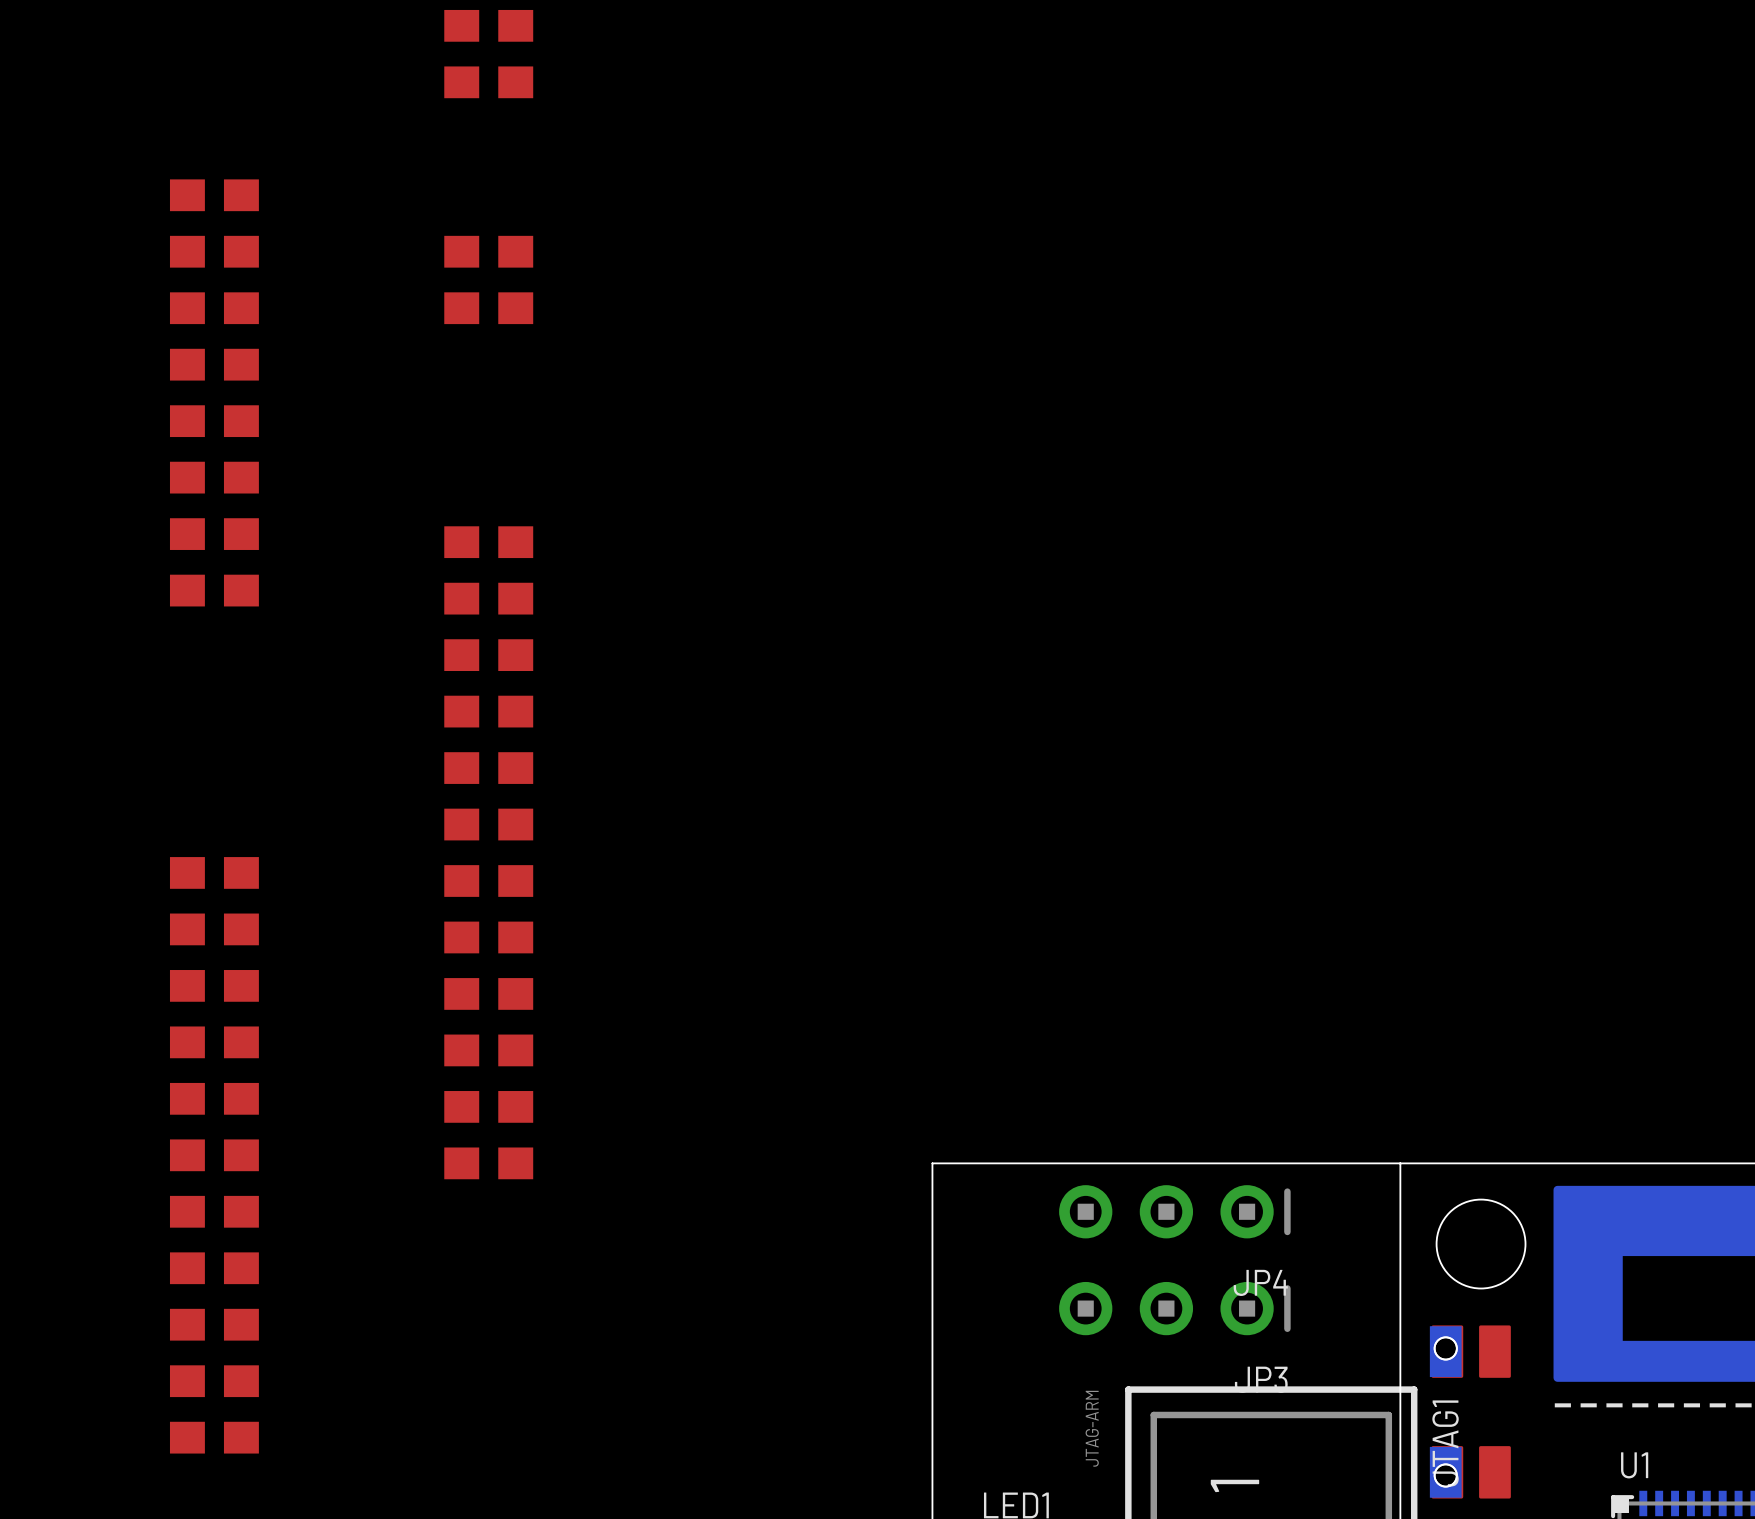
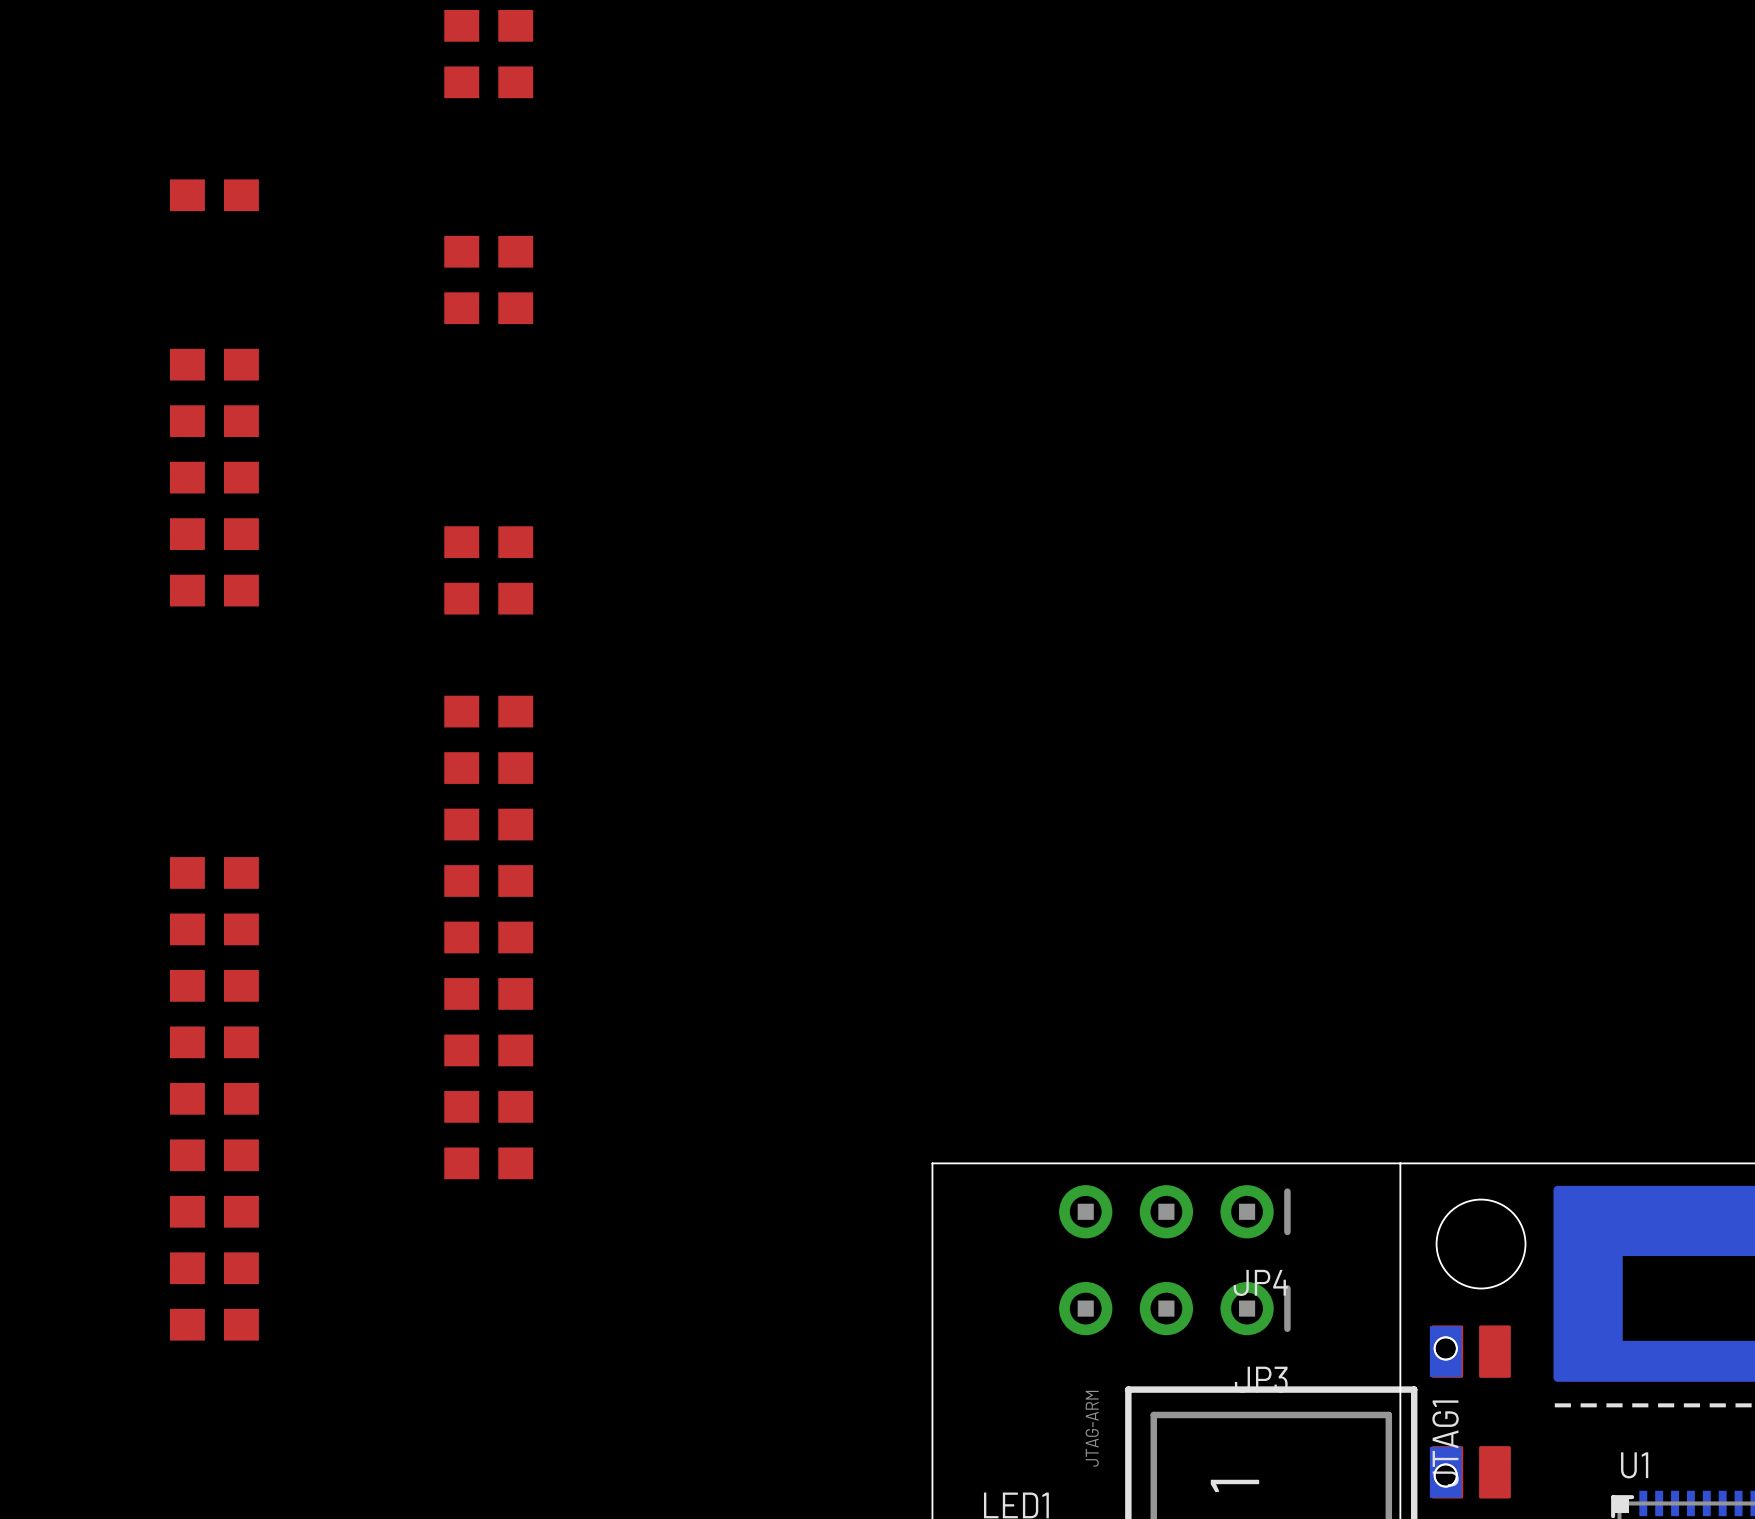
part: (214, 251) -> none
part: (214, 308) -> none
part: (488, 655) -> none
part: (214, 1381) -> none
part: (214, 1437) -> none

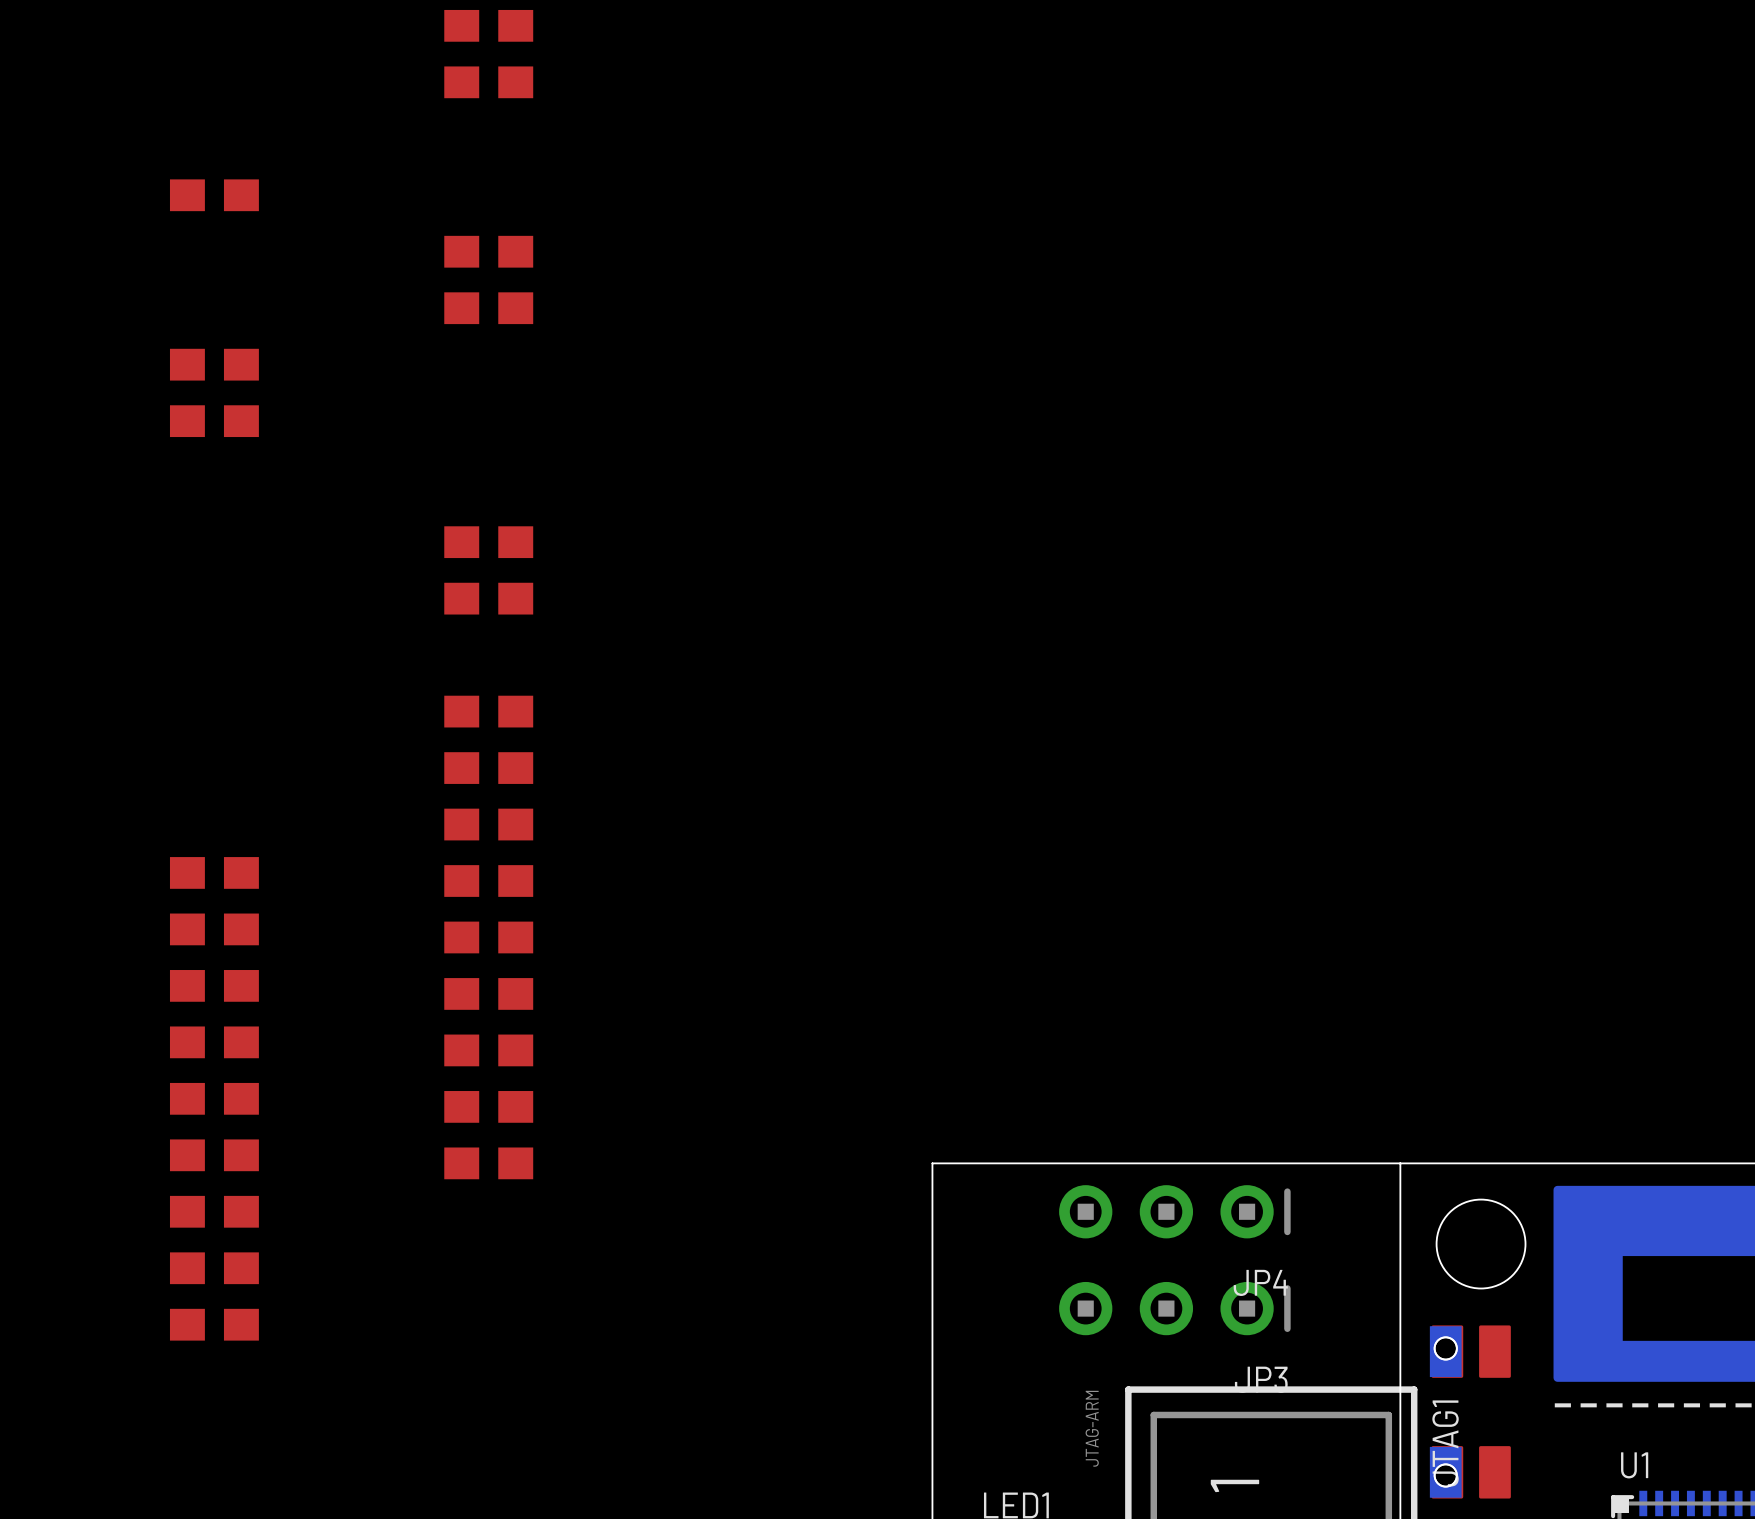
part: (214, 477) -> none
part: (214, 534) -> none
part: (214, 590) -> none

